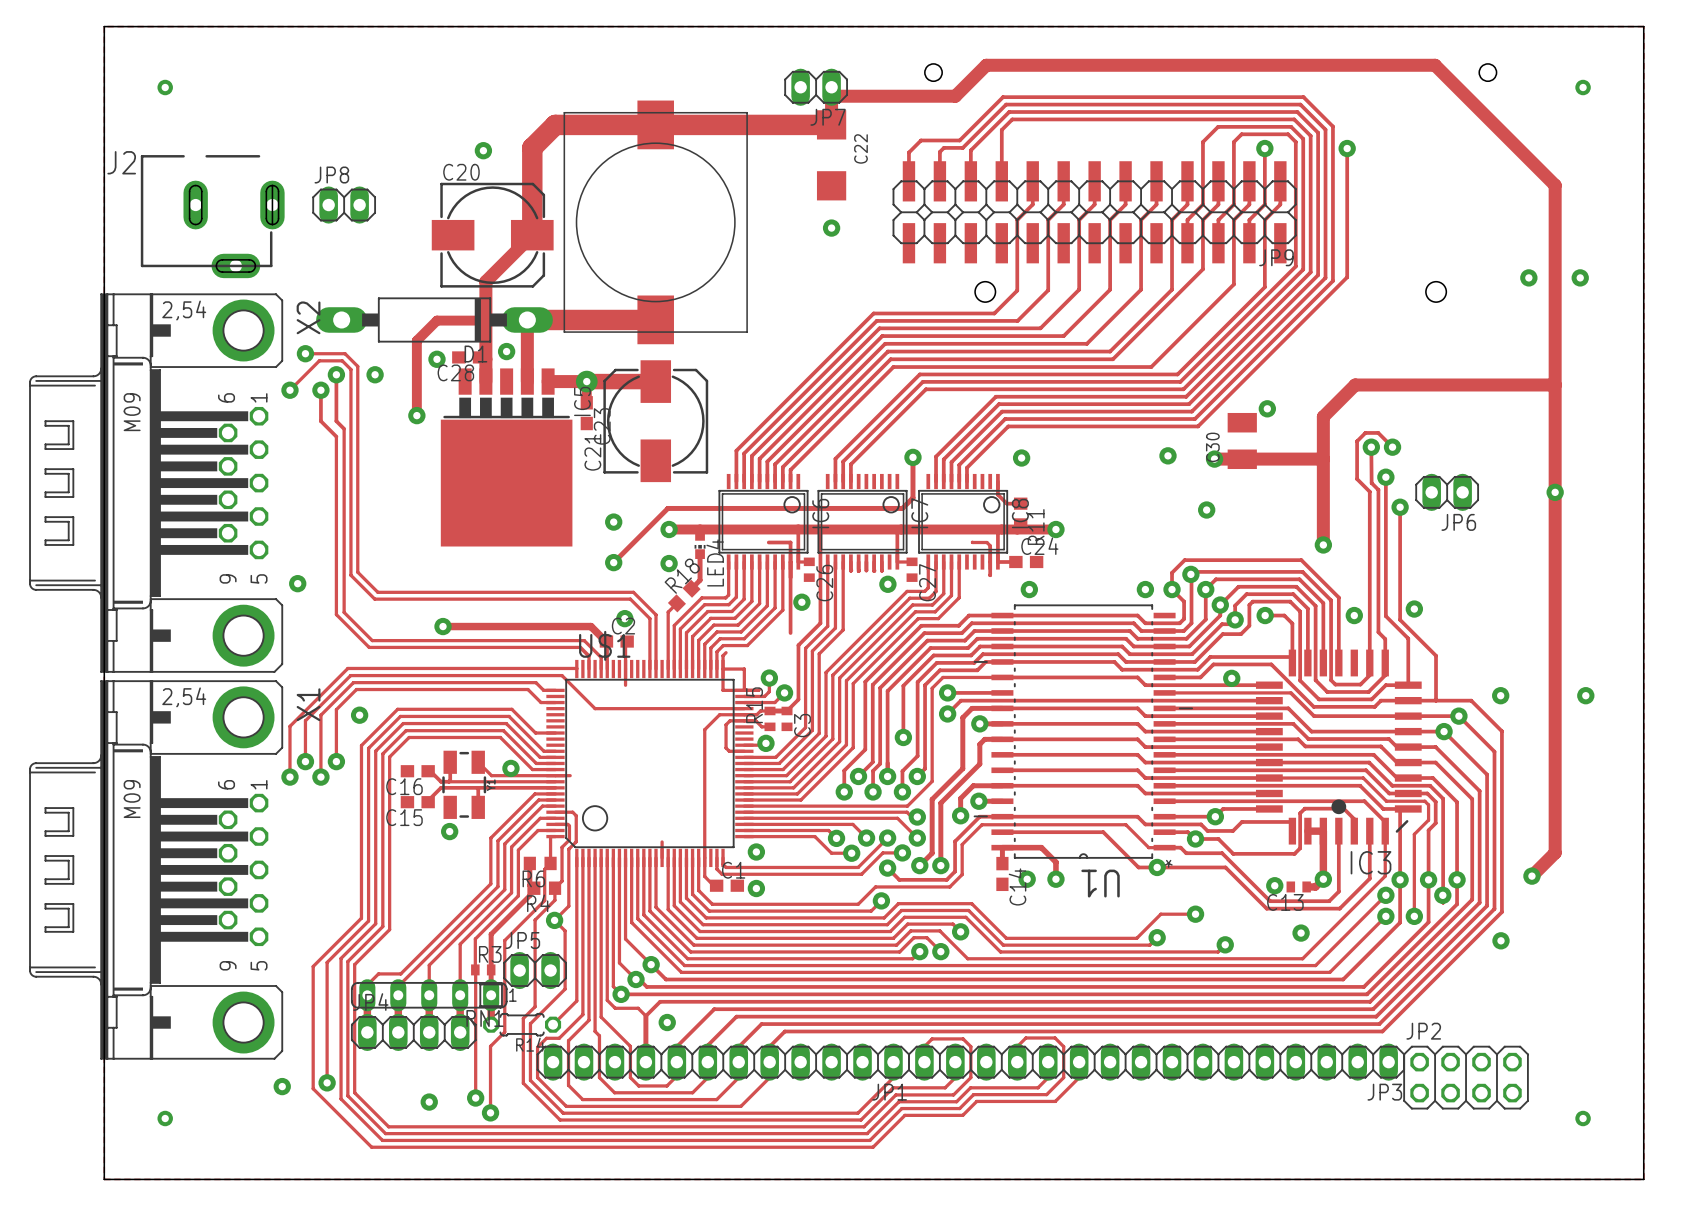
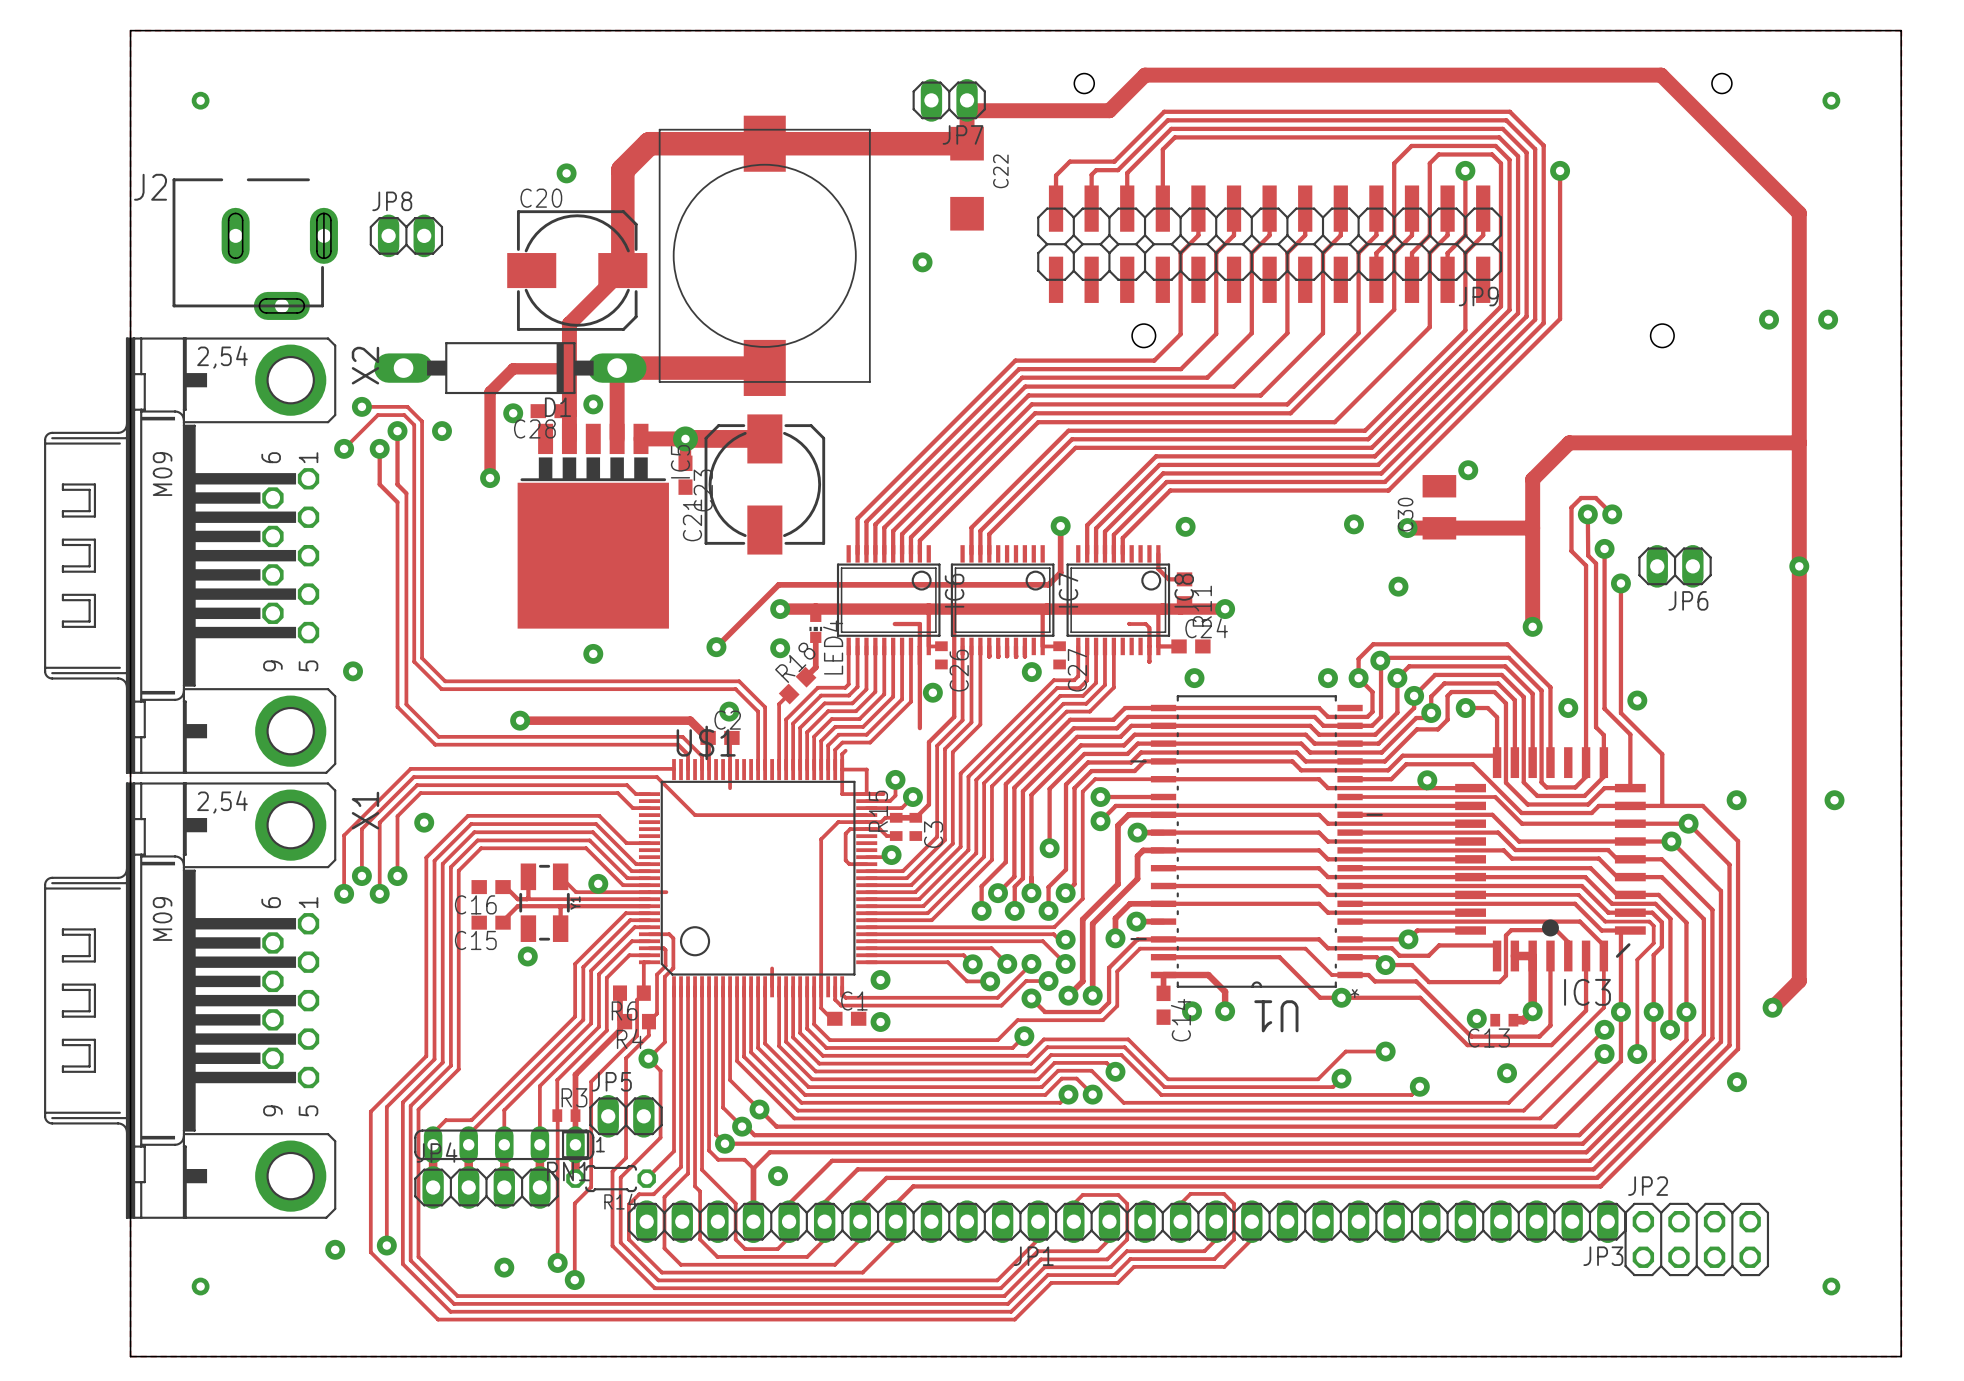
via position: (831, 228) -> (922, 262)
via: (613, 522) -> none
via: none -> (593, 653)

